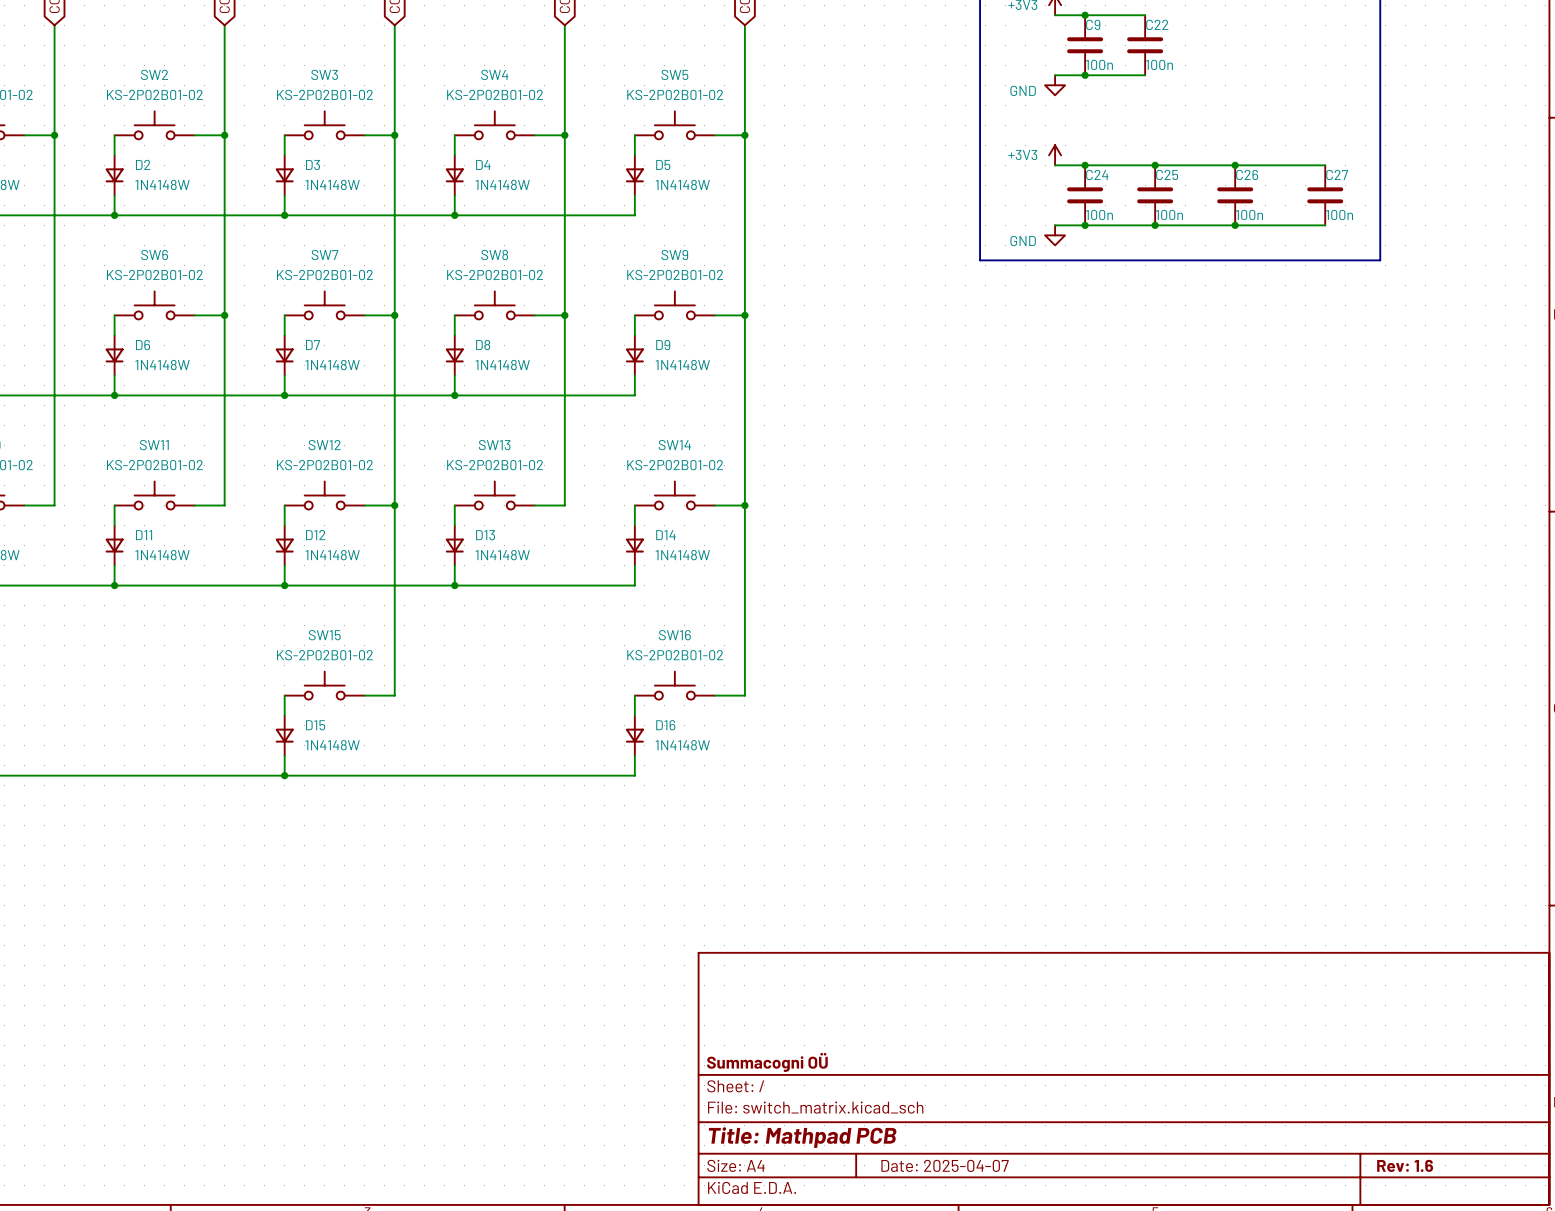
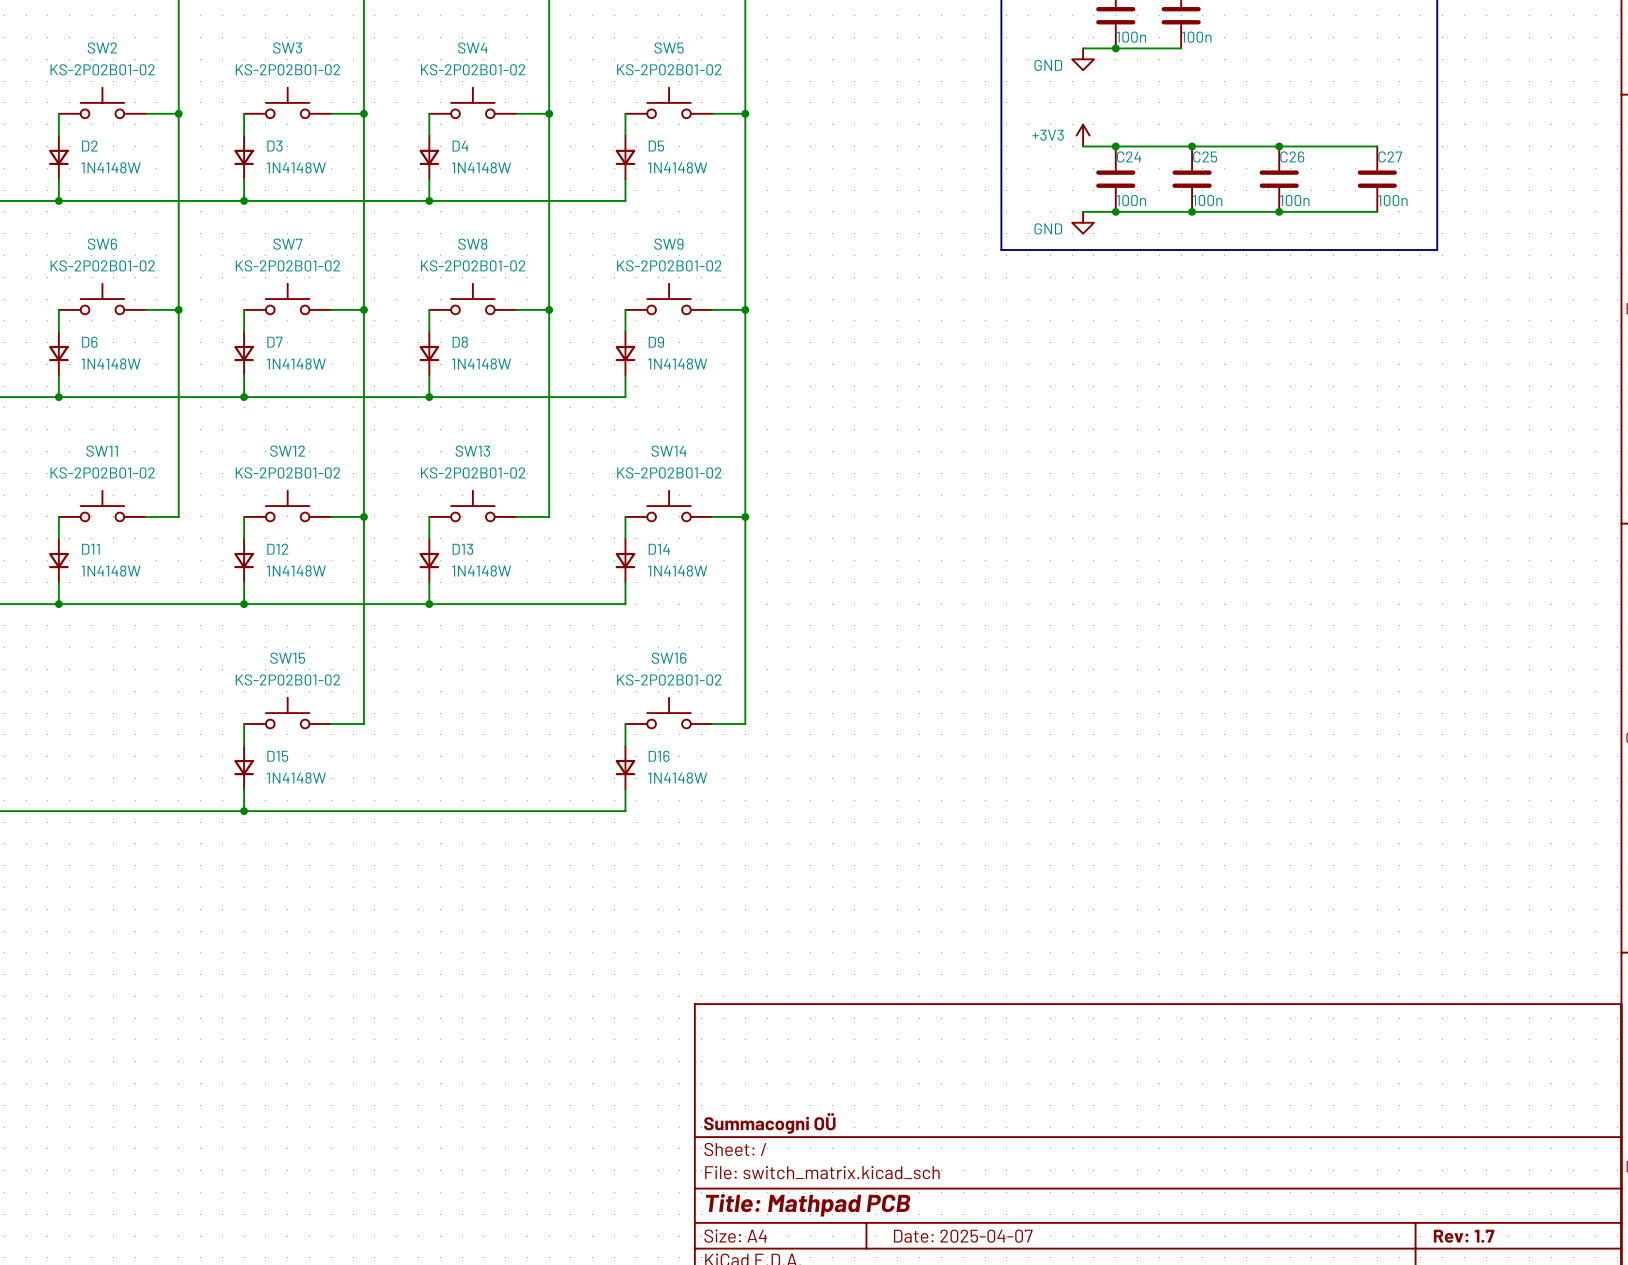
title block: Rev: 1.6 (1405, 1165) -> Rev: 1.7 (1464, 1236)

